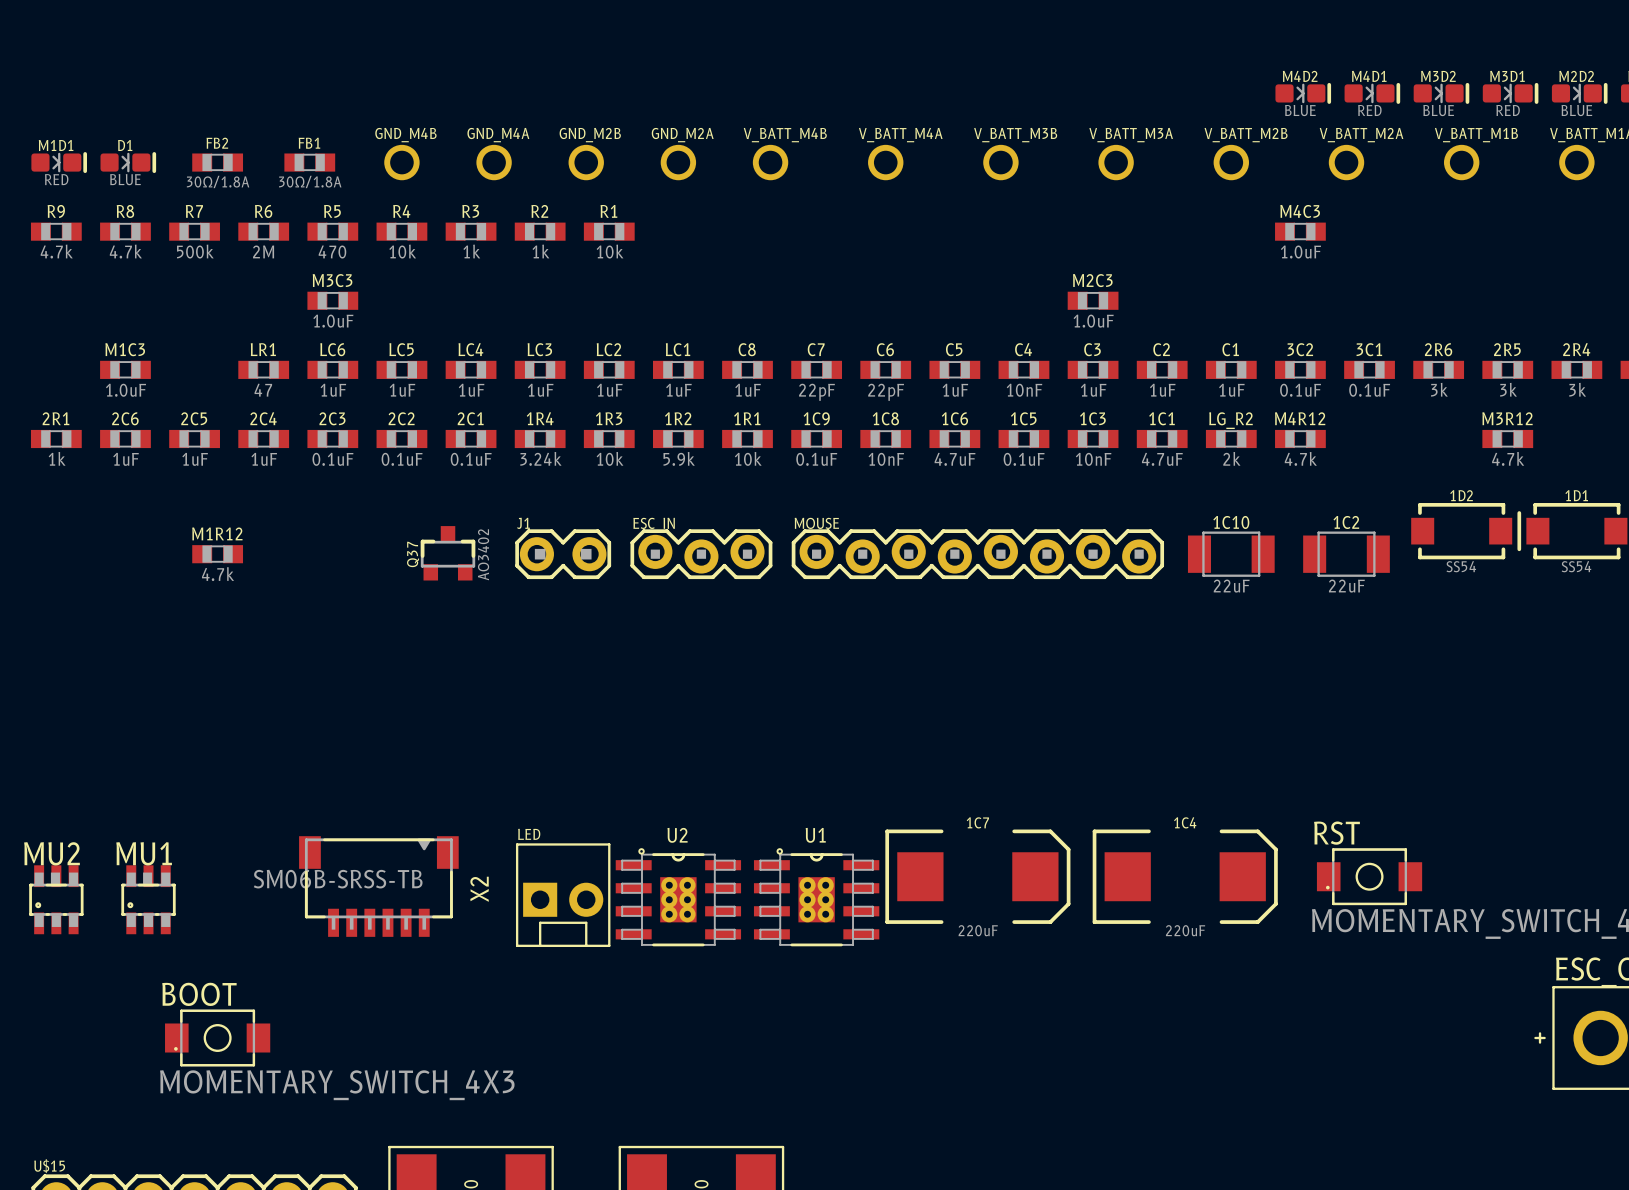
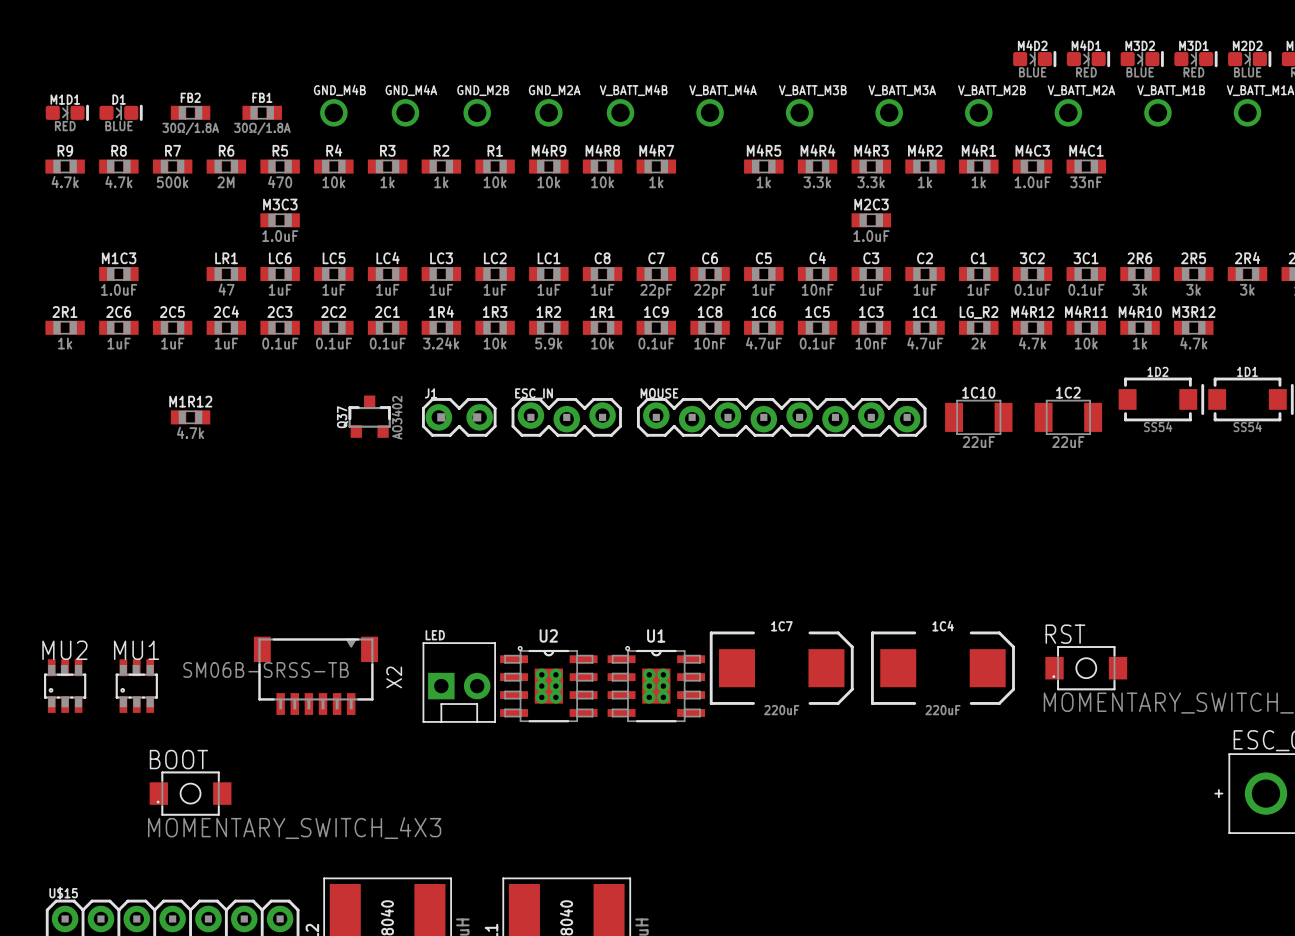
M4R9: none -> 10k (548, 166)
M4R8: none -> 10k (602, 166)
M4R7: none -> 1k (656, 166)
M4R5: none -> 1k (763, 166)
M4R4: none -> 3.3k (817, 166)
M4R3: none -> 3.3k (871, 166)
M4R2: none -> 1k (925, 166)
M4R1: none -> 1k (978, 166)
M4C1: none -> 33nF (1086, 166)
M4R11: none -> 10k (1086, 327)
M4R10: none -> 1k (1140, 327)

